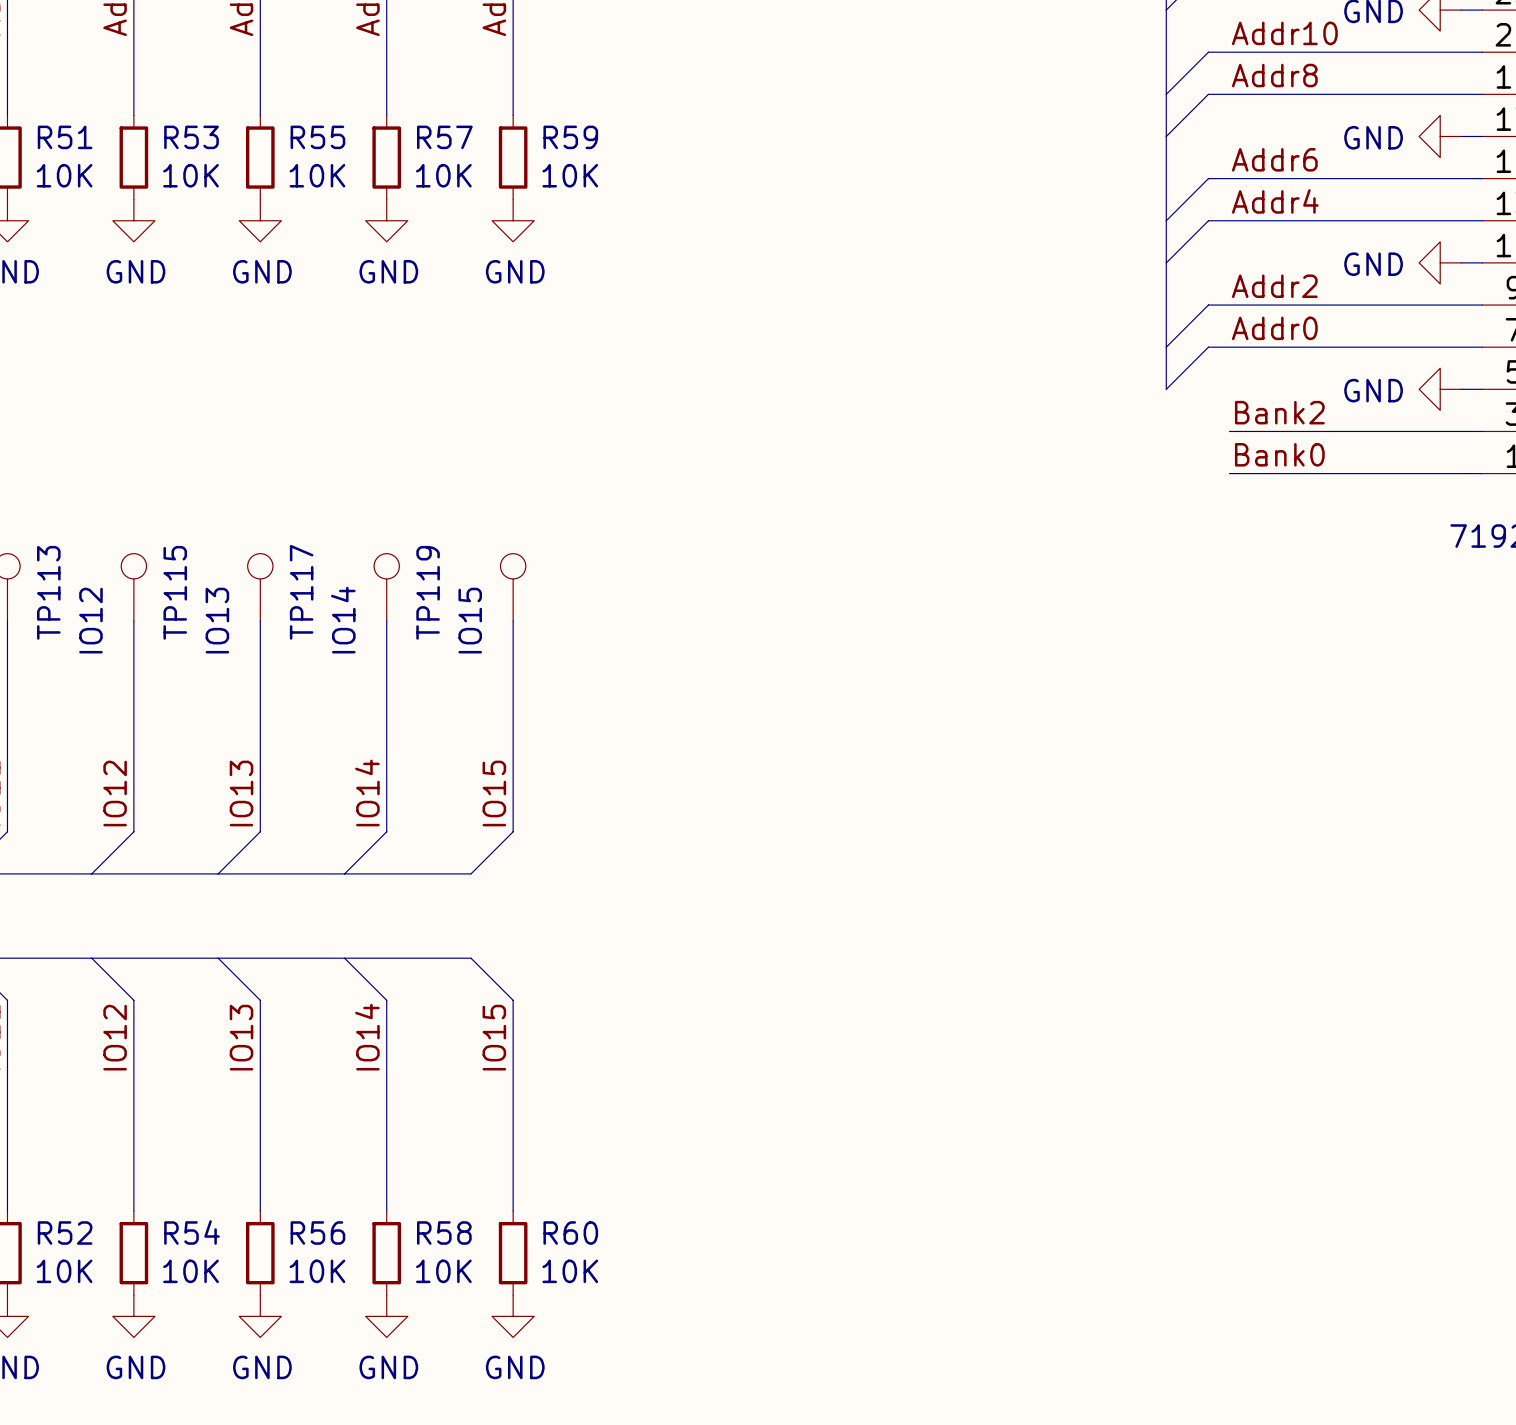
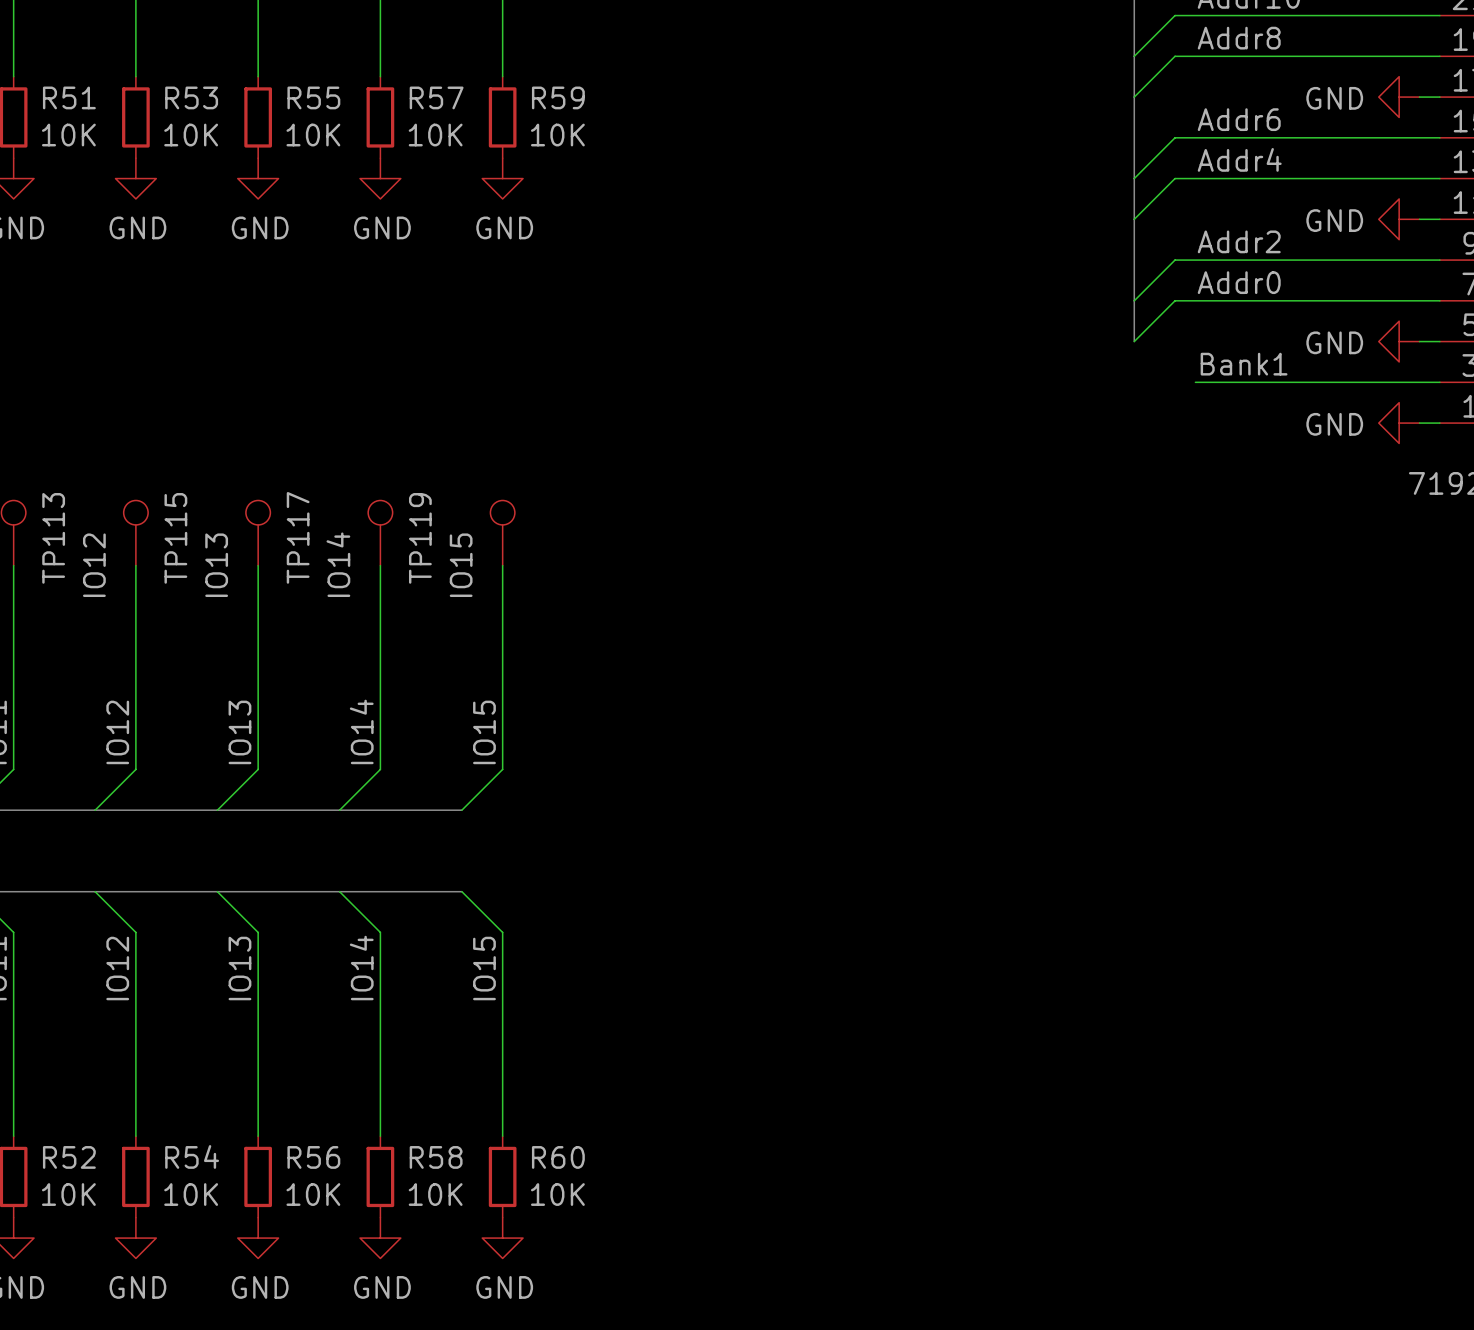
label: Bank2 (1279, 412) -> Bank1 (1244, 364)
label: Bank0 (1279, 454) -> none
wire: (1229, 473) (1461, 473) -> none
power symbol: none -> GND (1399, 423)

